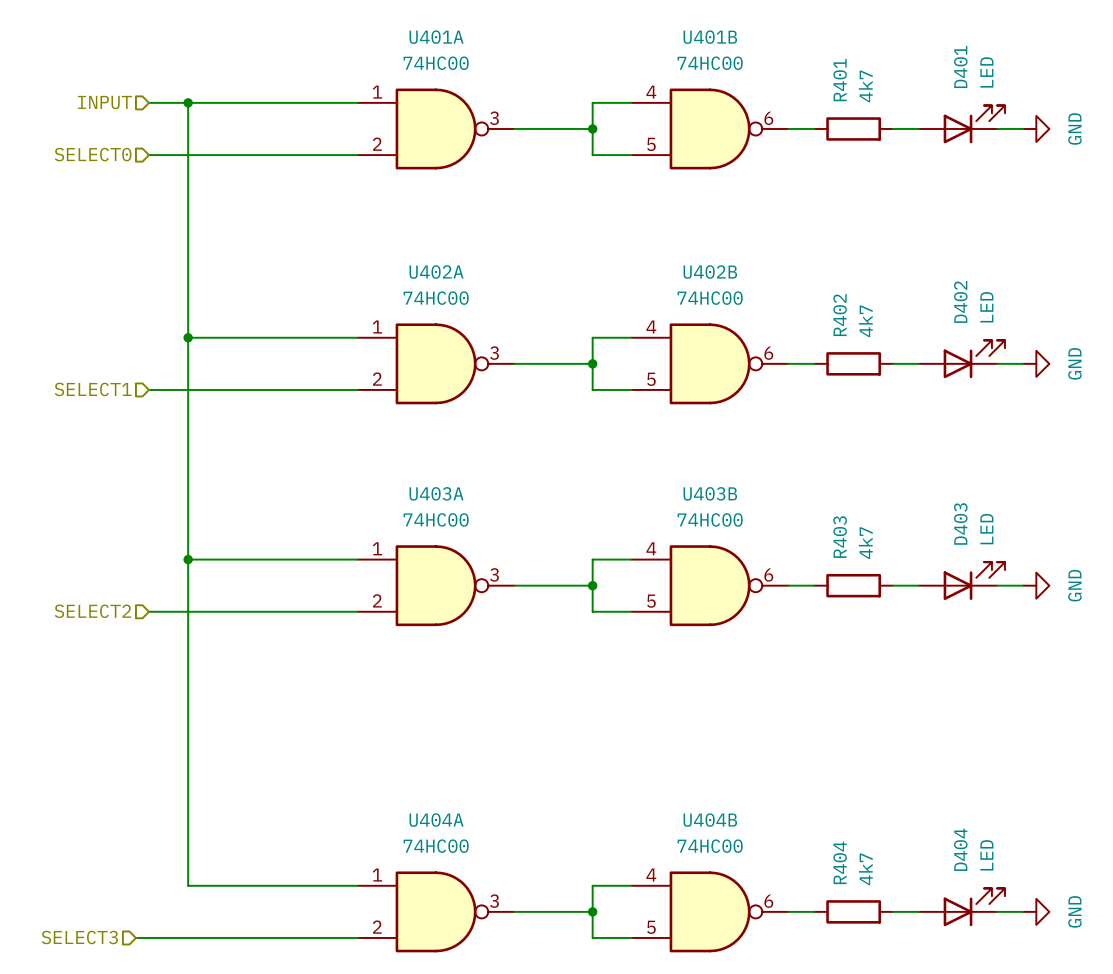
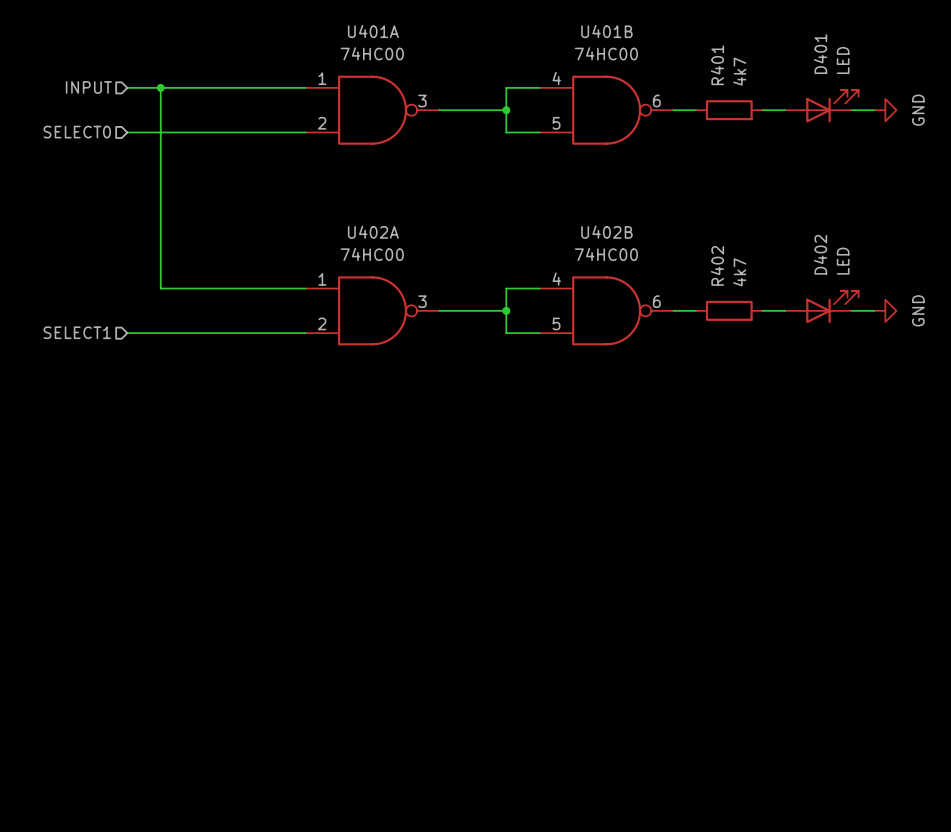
wire: (188, 337) (188, 885) (357, 885) -> none
junction: (188, 337) -> none
wire: (188, 559) (357, 559) -> none
junction: (188, 559) -> none
wire: (631, 559) (592, 559) (592, 611) (631, 611) -> none
D403: LED (961, 581) -> none
U403A: 74HC00 (436, 585) -> none
wire: (514, 585) (592, 585) -> none
junction: (592, 585) -> none
U403B: 74HC00 (710, 585) -> none
wire: (788, 585) (814, 585) -> none
R403: 4k7 (853, 585) -> none
wire: (892, 585) (918, 585) -> none
wire: (997, 585) (1023, 585) -> none
power symbol: GND (1036, 585) -> none
hierarchical label: SELECT2 (93, 611) -> none
wire: (149, 611) (357, 611) -> none
wire: (631, 885) (592, 885) (592, 937) (631, 937) -> none
D404: LED (961, 907) -> none
U404A: 74HC00 (436, 911) -> none
wire: (514, 911) (592, 911) -> none
junction: (592, 911) -> none
U404B: 74HC00 (710, 911) -> none
wire: (788, 911) (814, 911) -> none
R404: 4k7 (853, 911) -> none
wire: (892, 911) (918, 911) -> none
wire: (997, 911) (1023, 911) -> none
power symbol: GND (1036, 911) -> none
hierarchical label: SELECT3 (79, 937) -> none
wire: (135, 937) (357, 937) -> none

